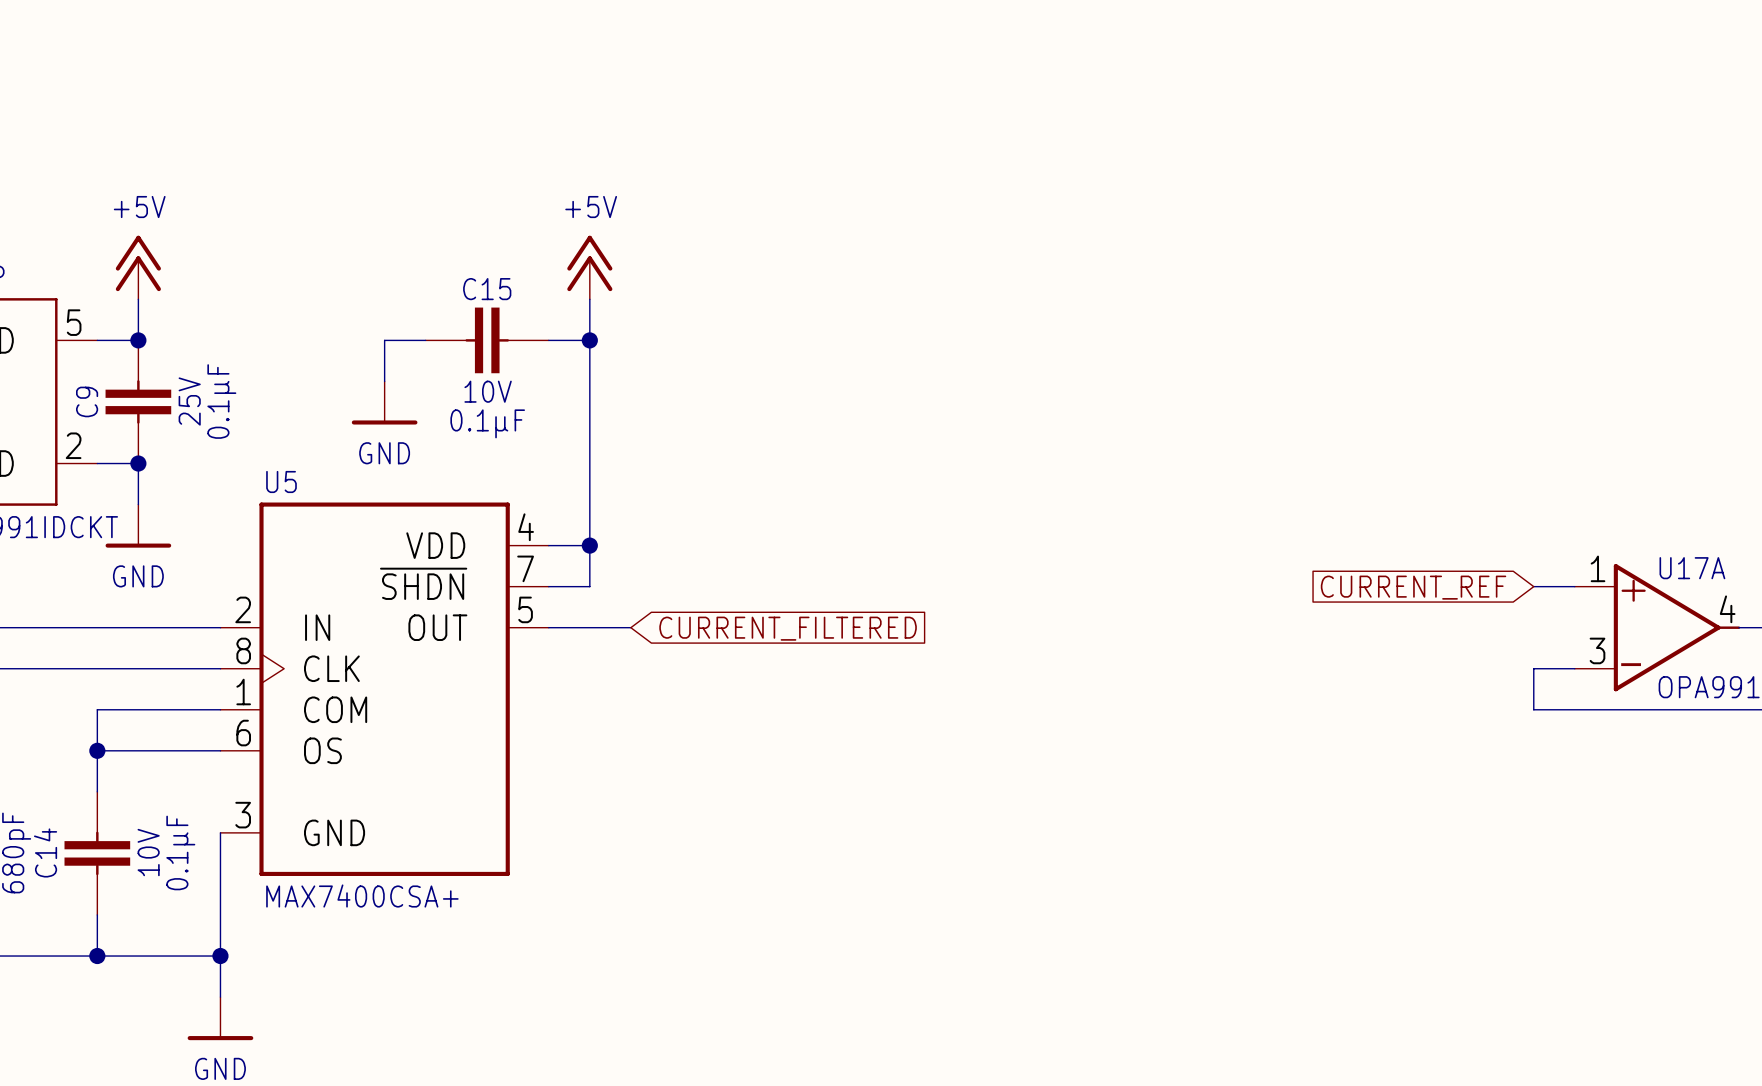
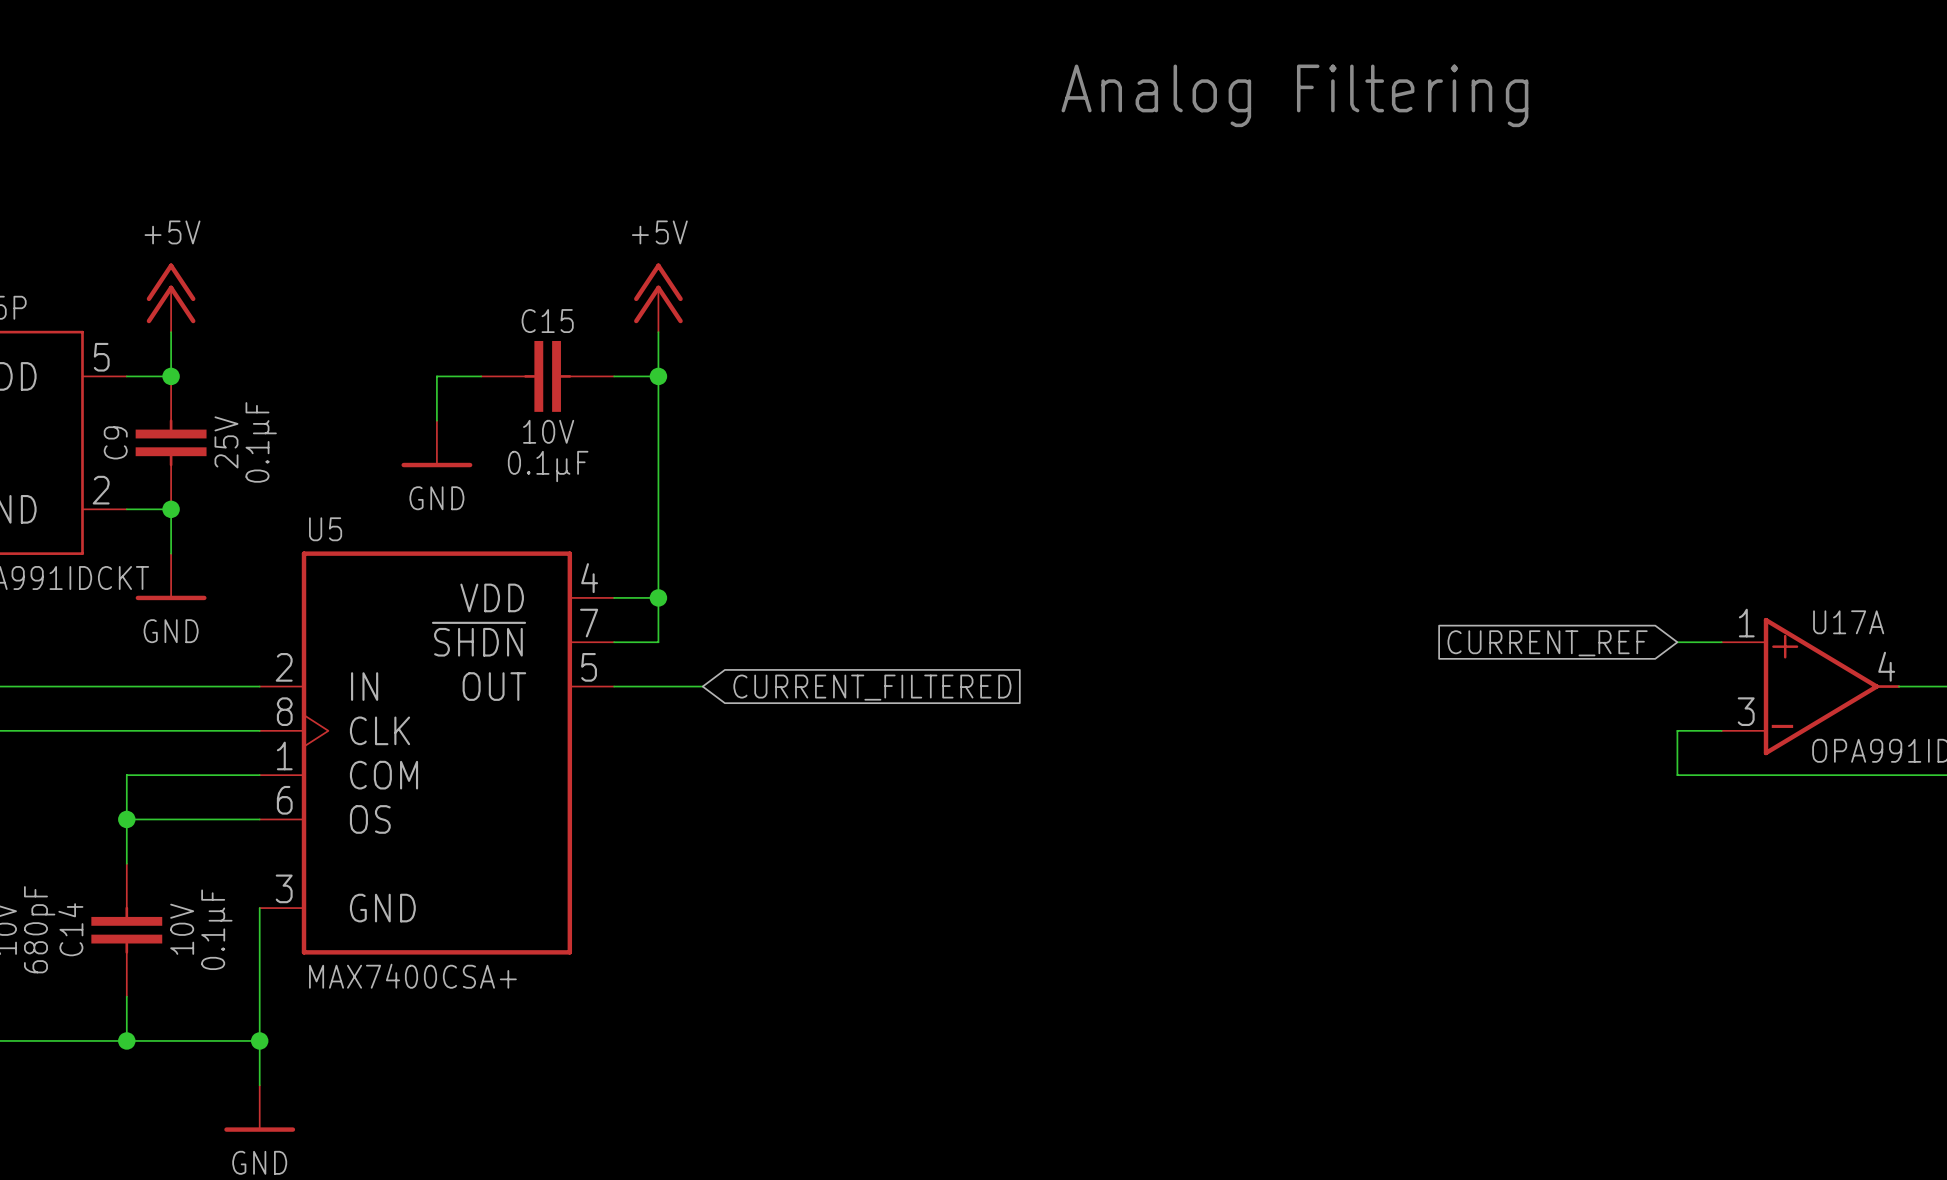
text: none -> Analog Filtering (1294, 95)

